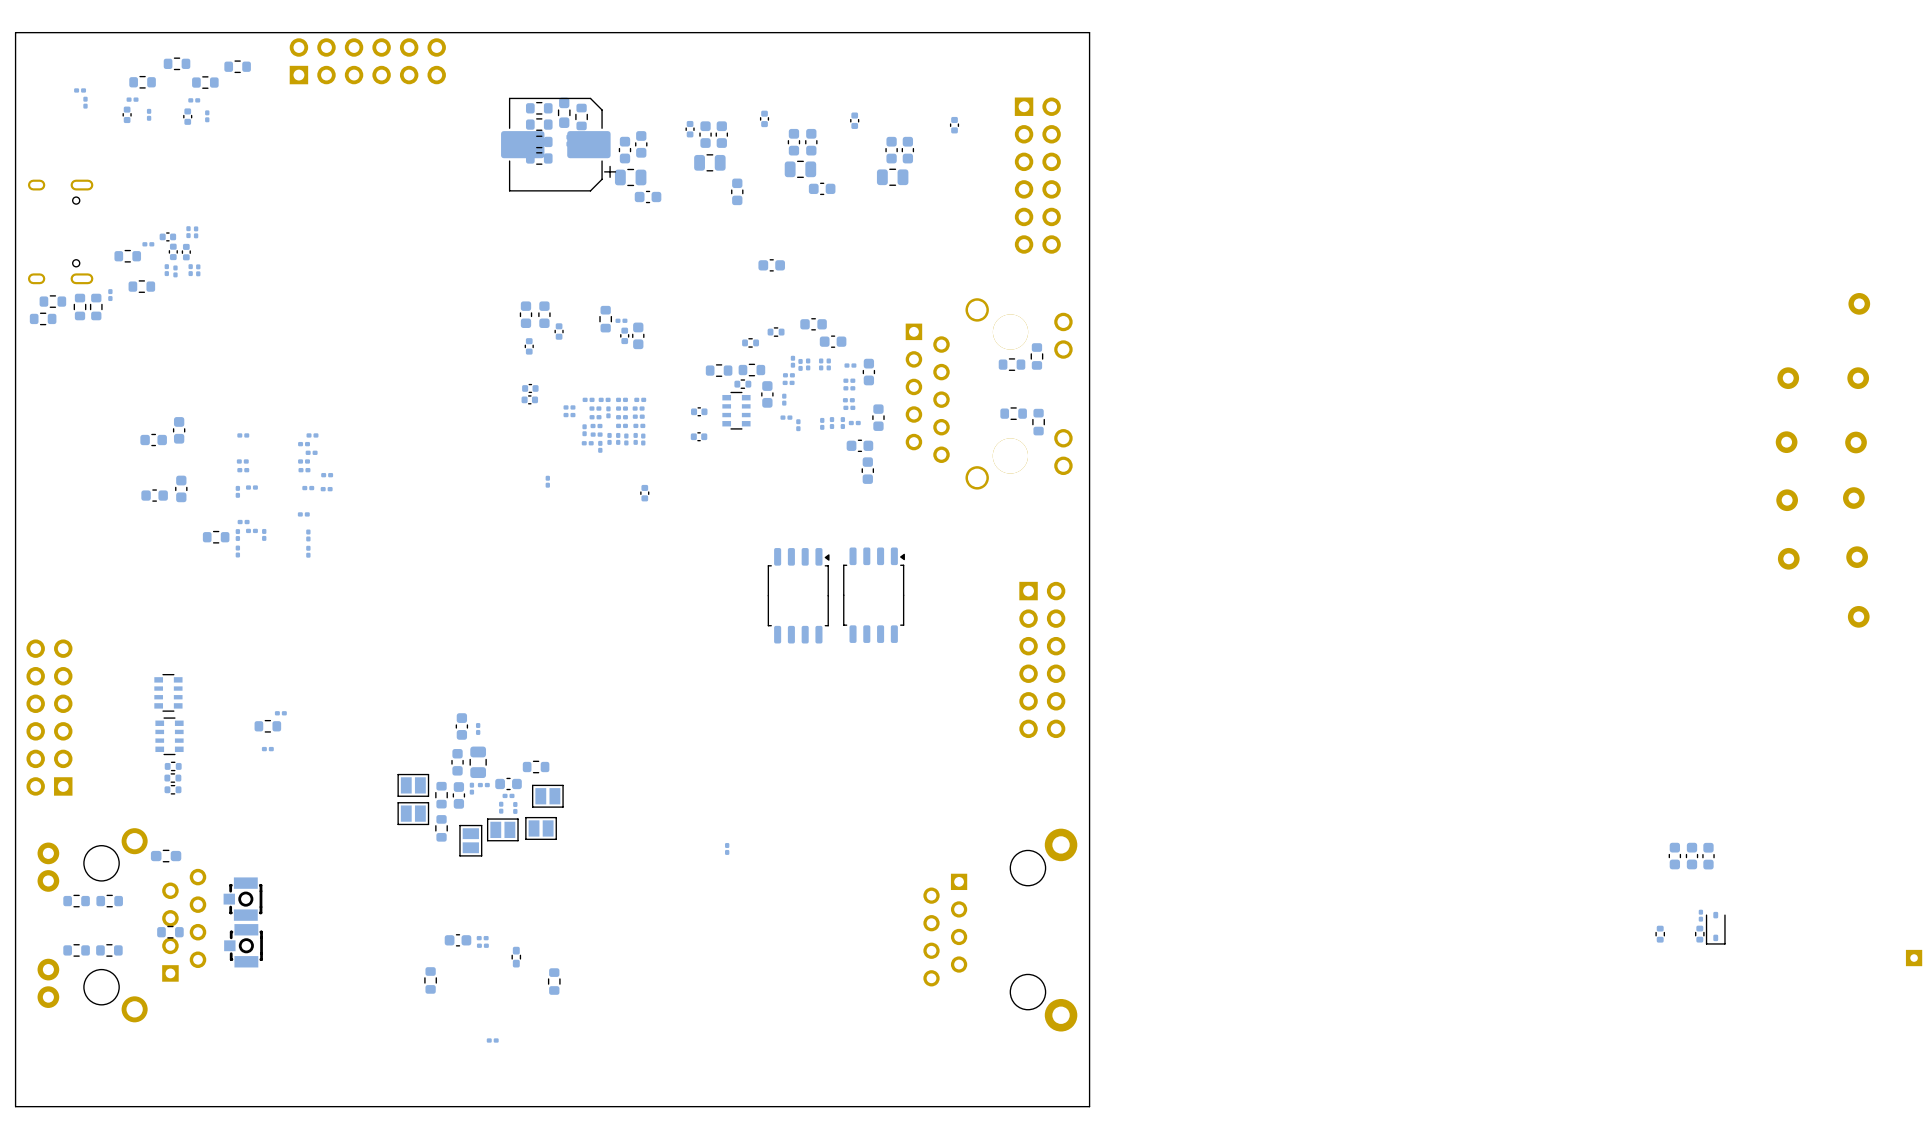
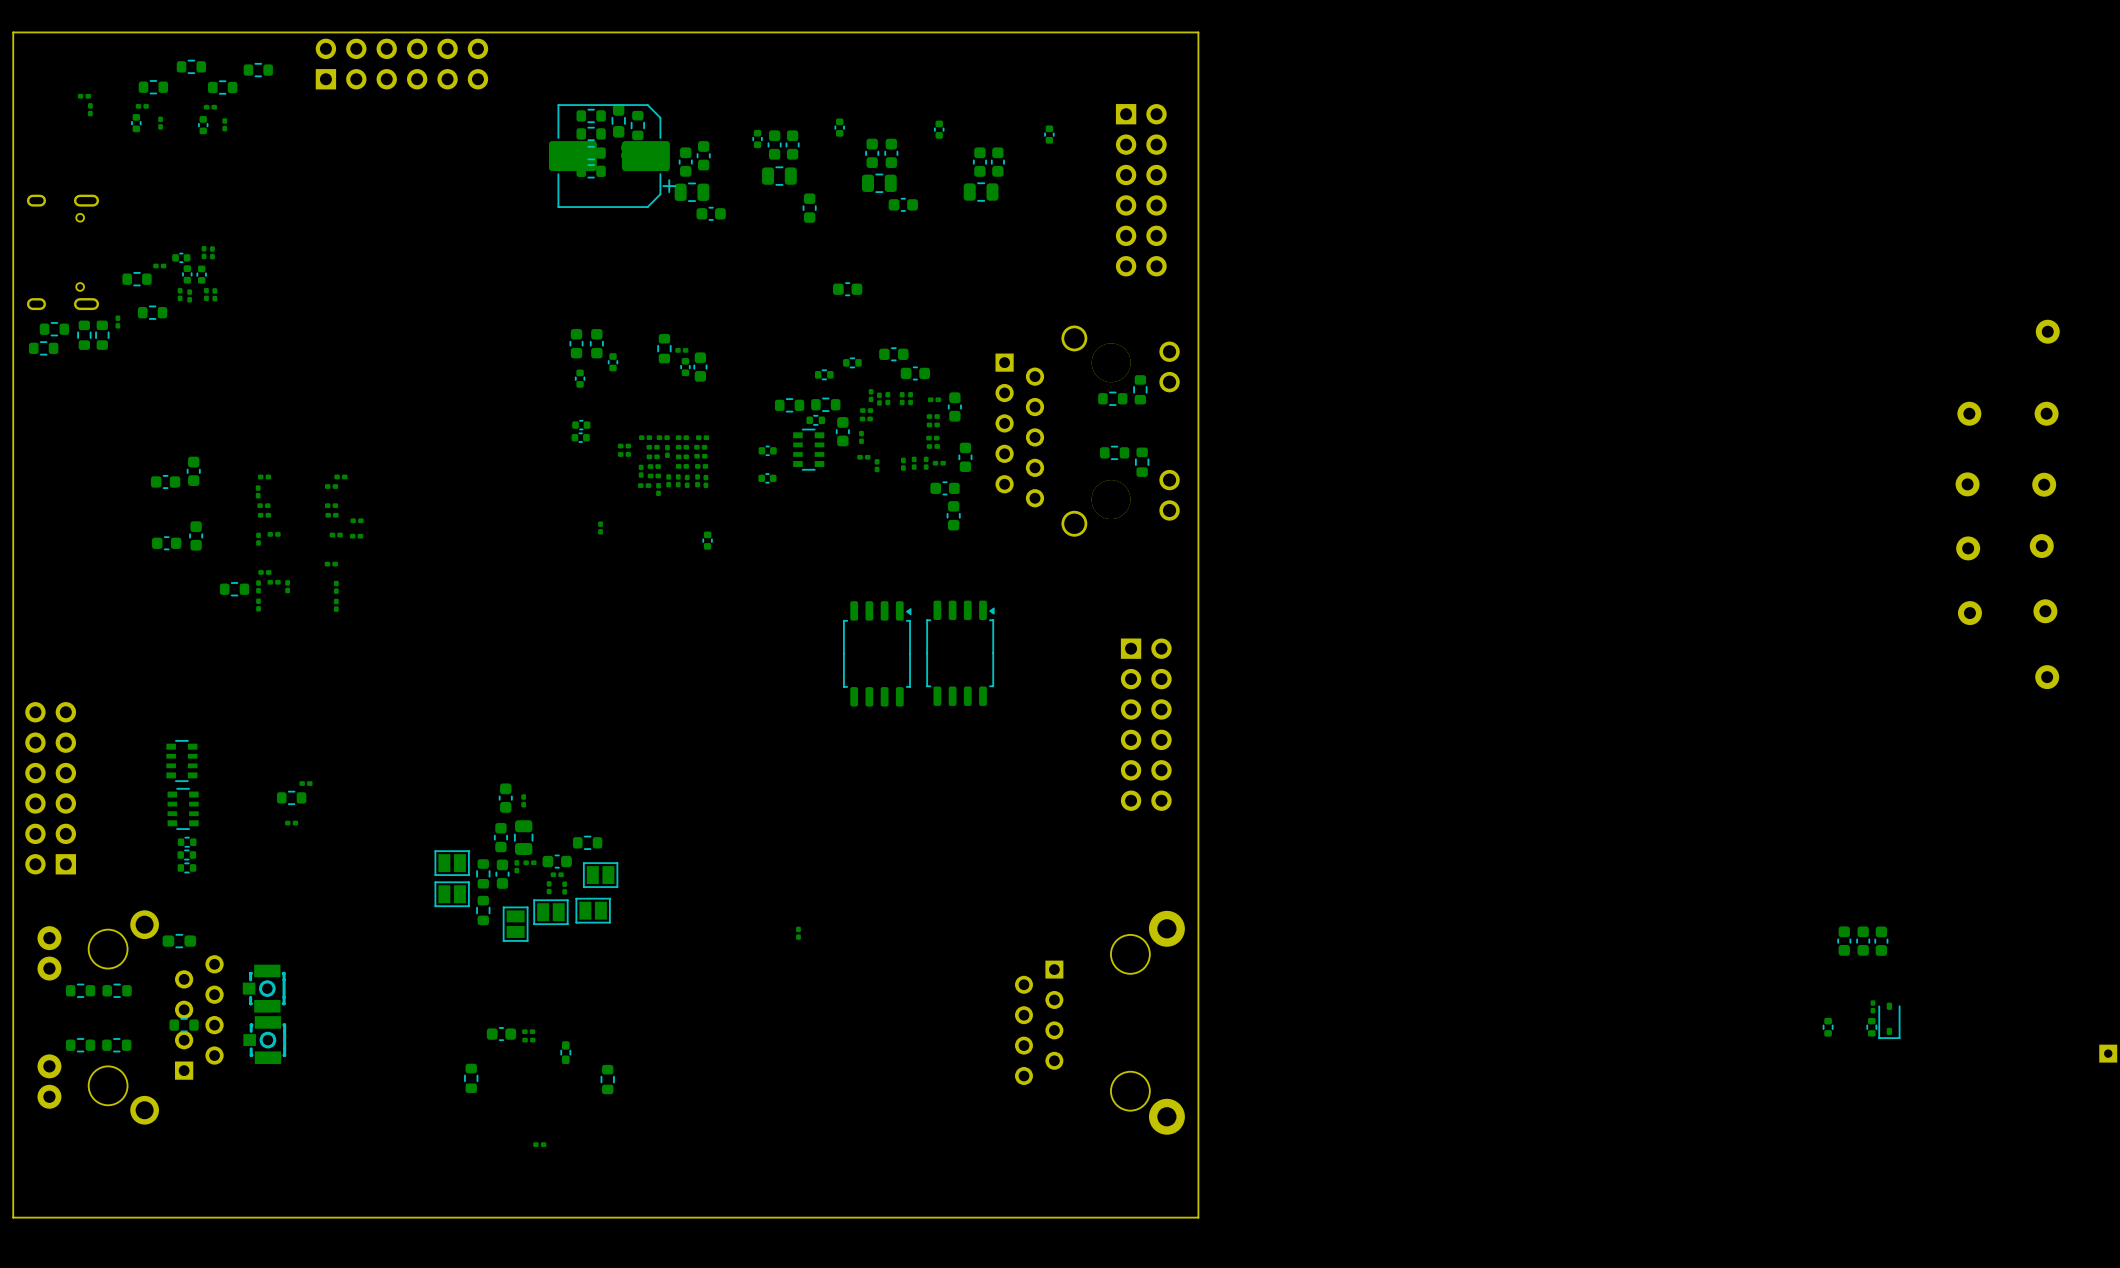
part rotation: 0° (311, 452) -> 90° clockwise (258, 491)
part position: (311, 452) -> (258, 491)

